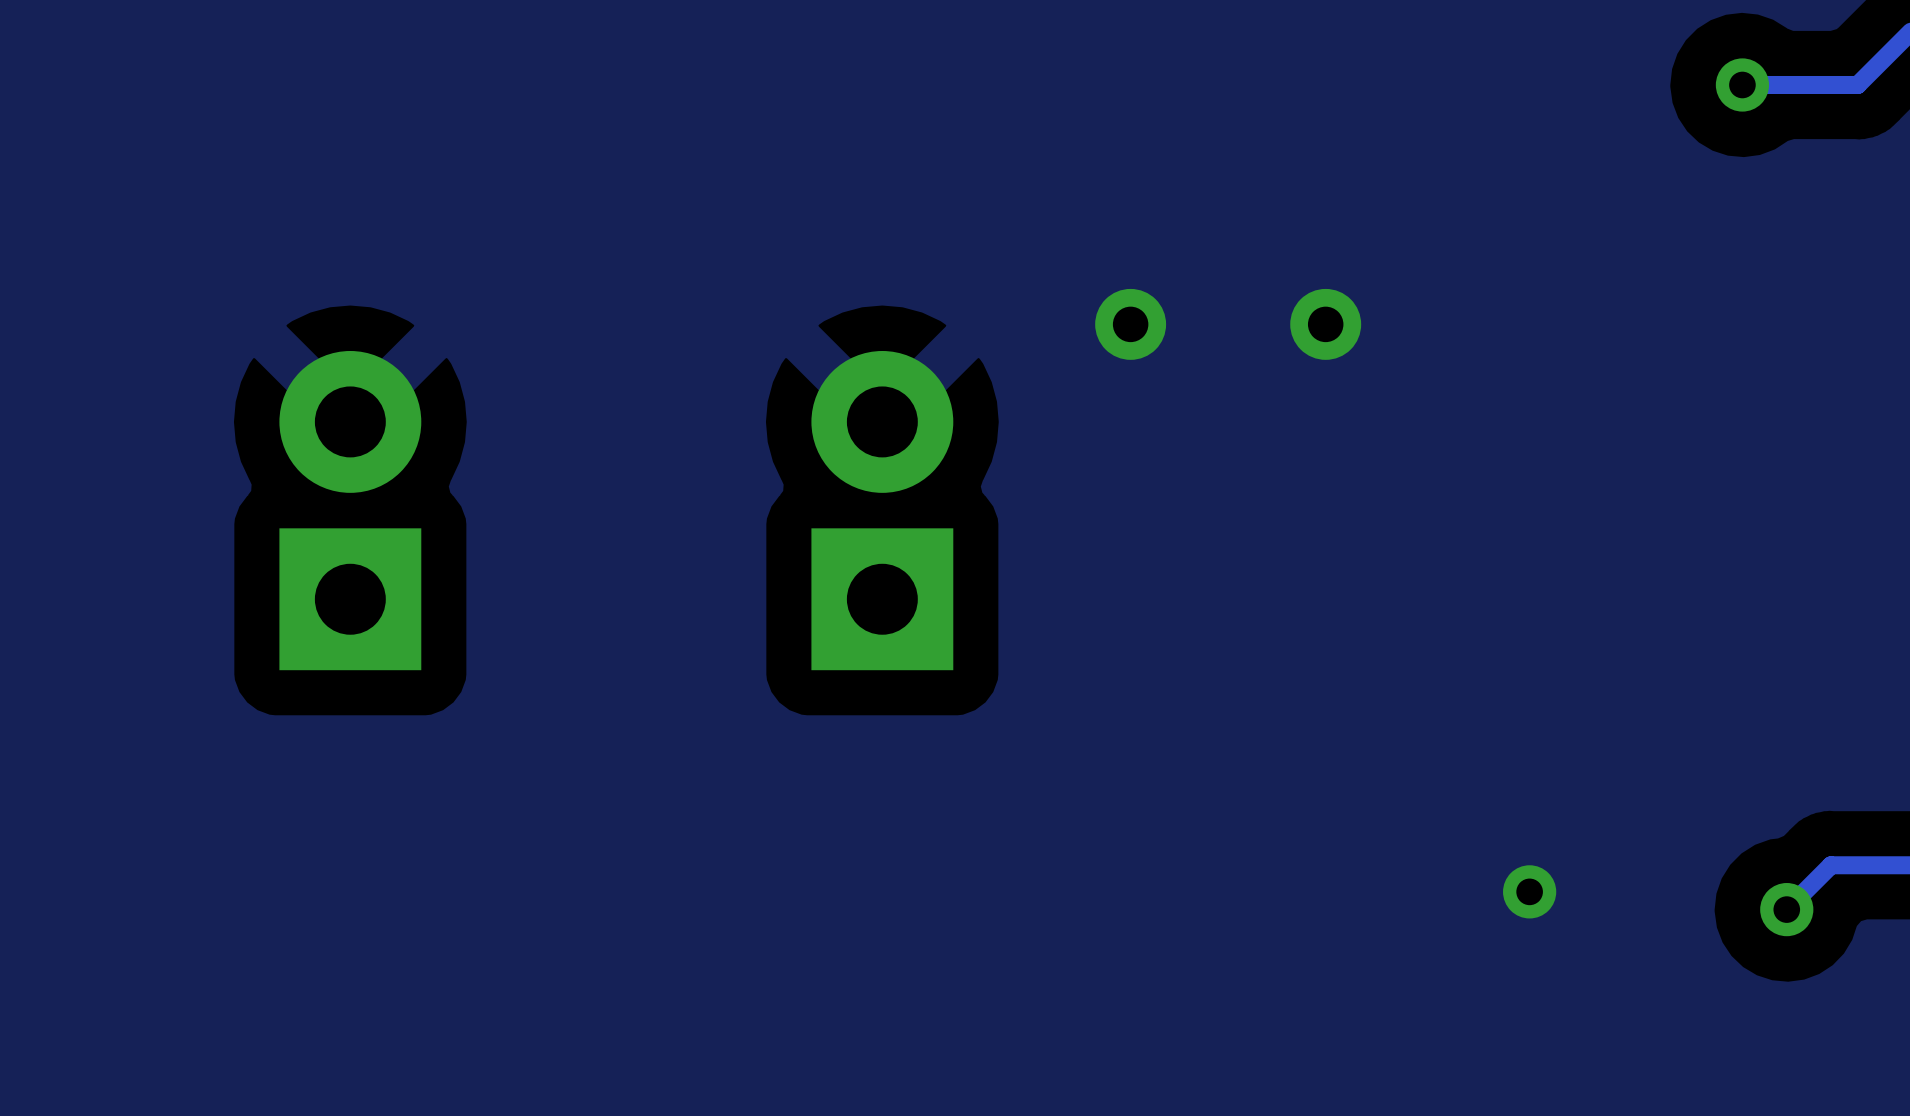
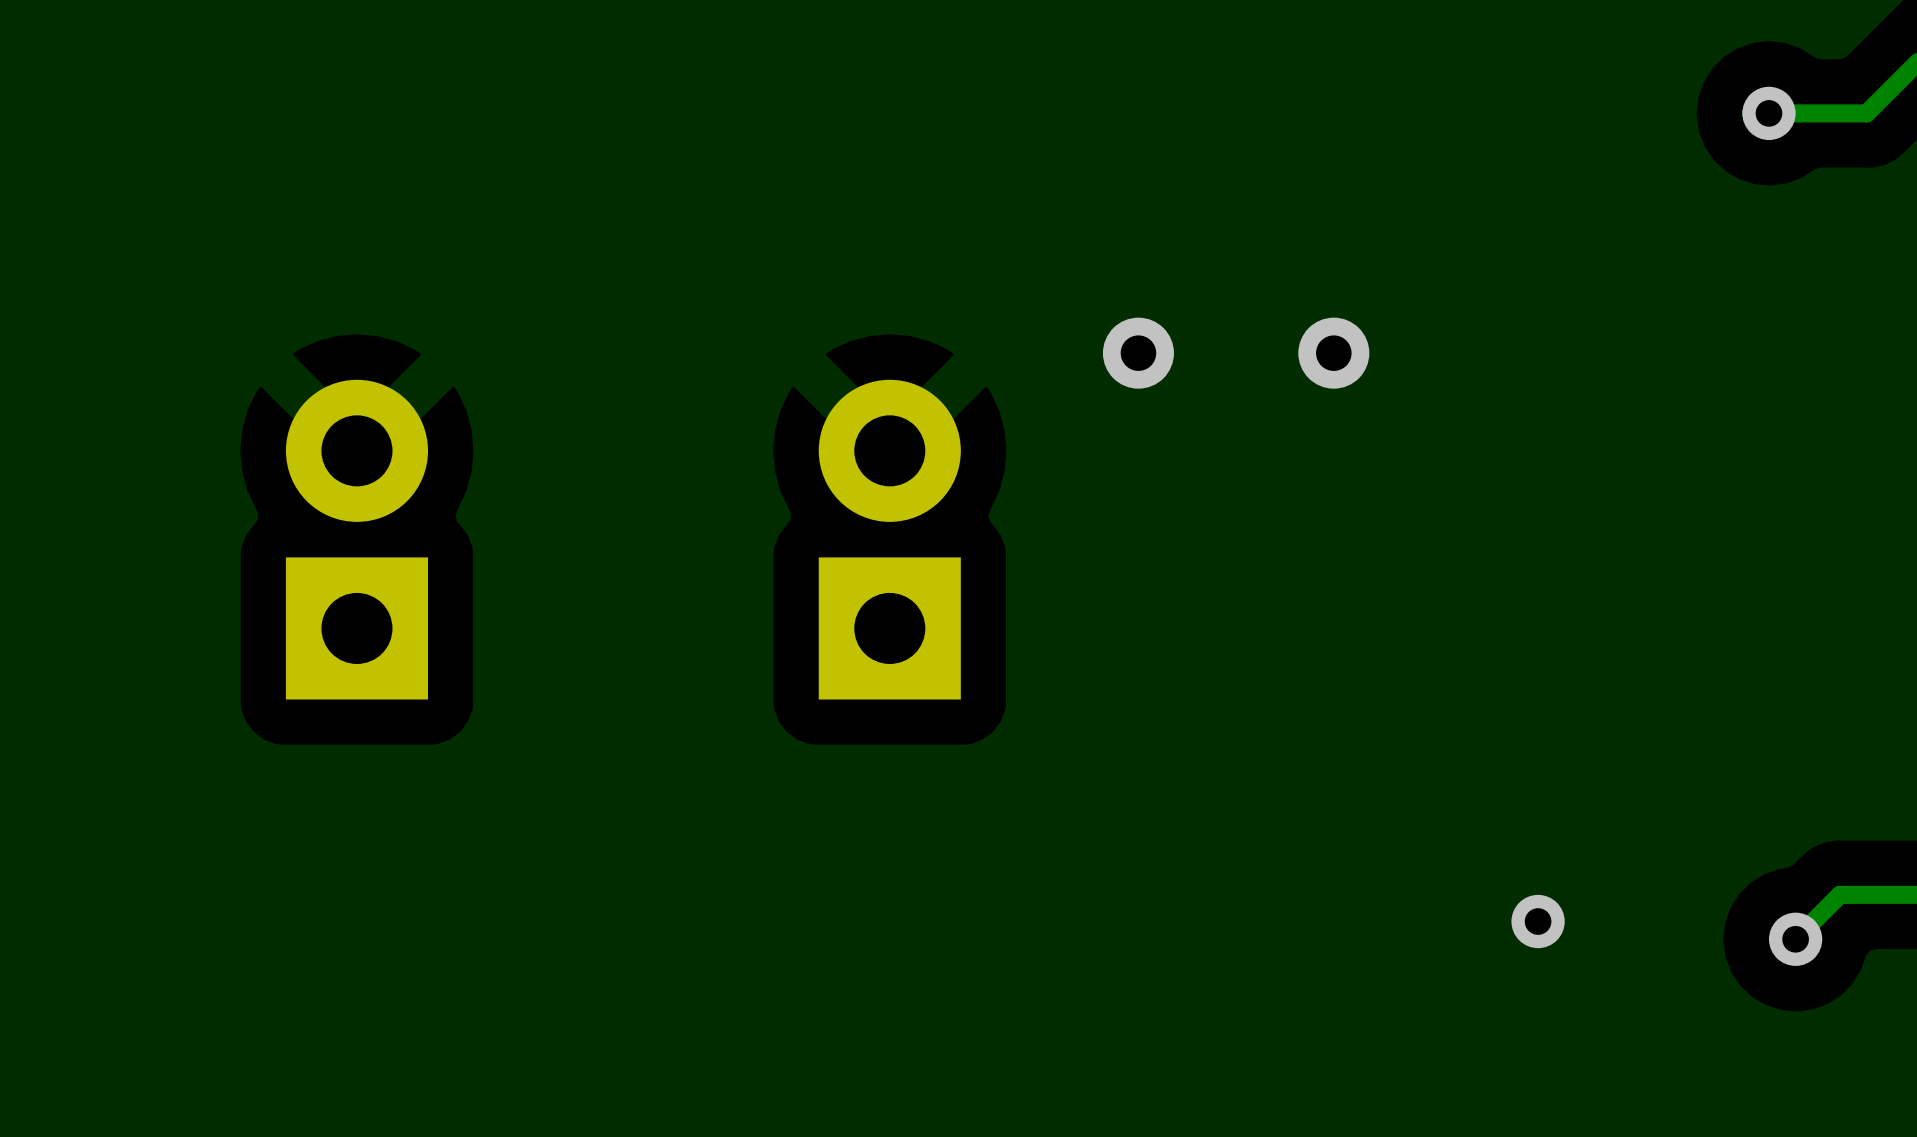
via position: (1742, 84) -> (1768, 113)

